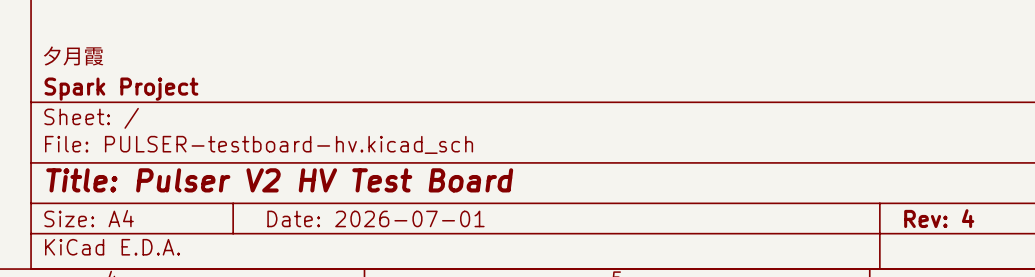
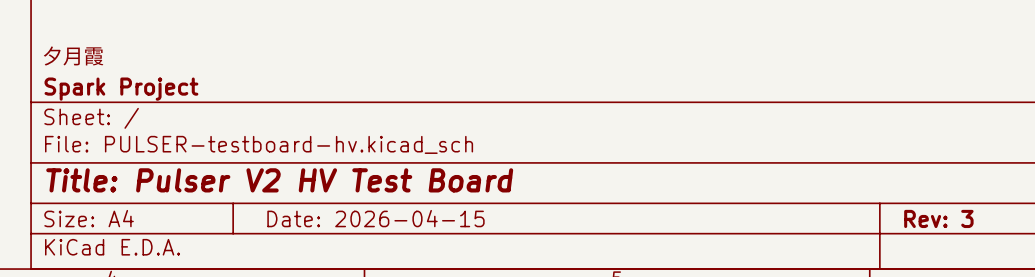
title block: Date: 2026-07-01 (375, 218) -> Date: 2026-04-15 (375, 218)
title block: Rev: 4 (939, 218) -> Rev: 3 (938, 218)

